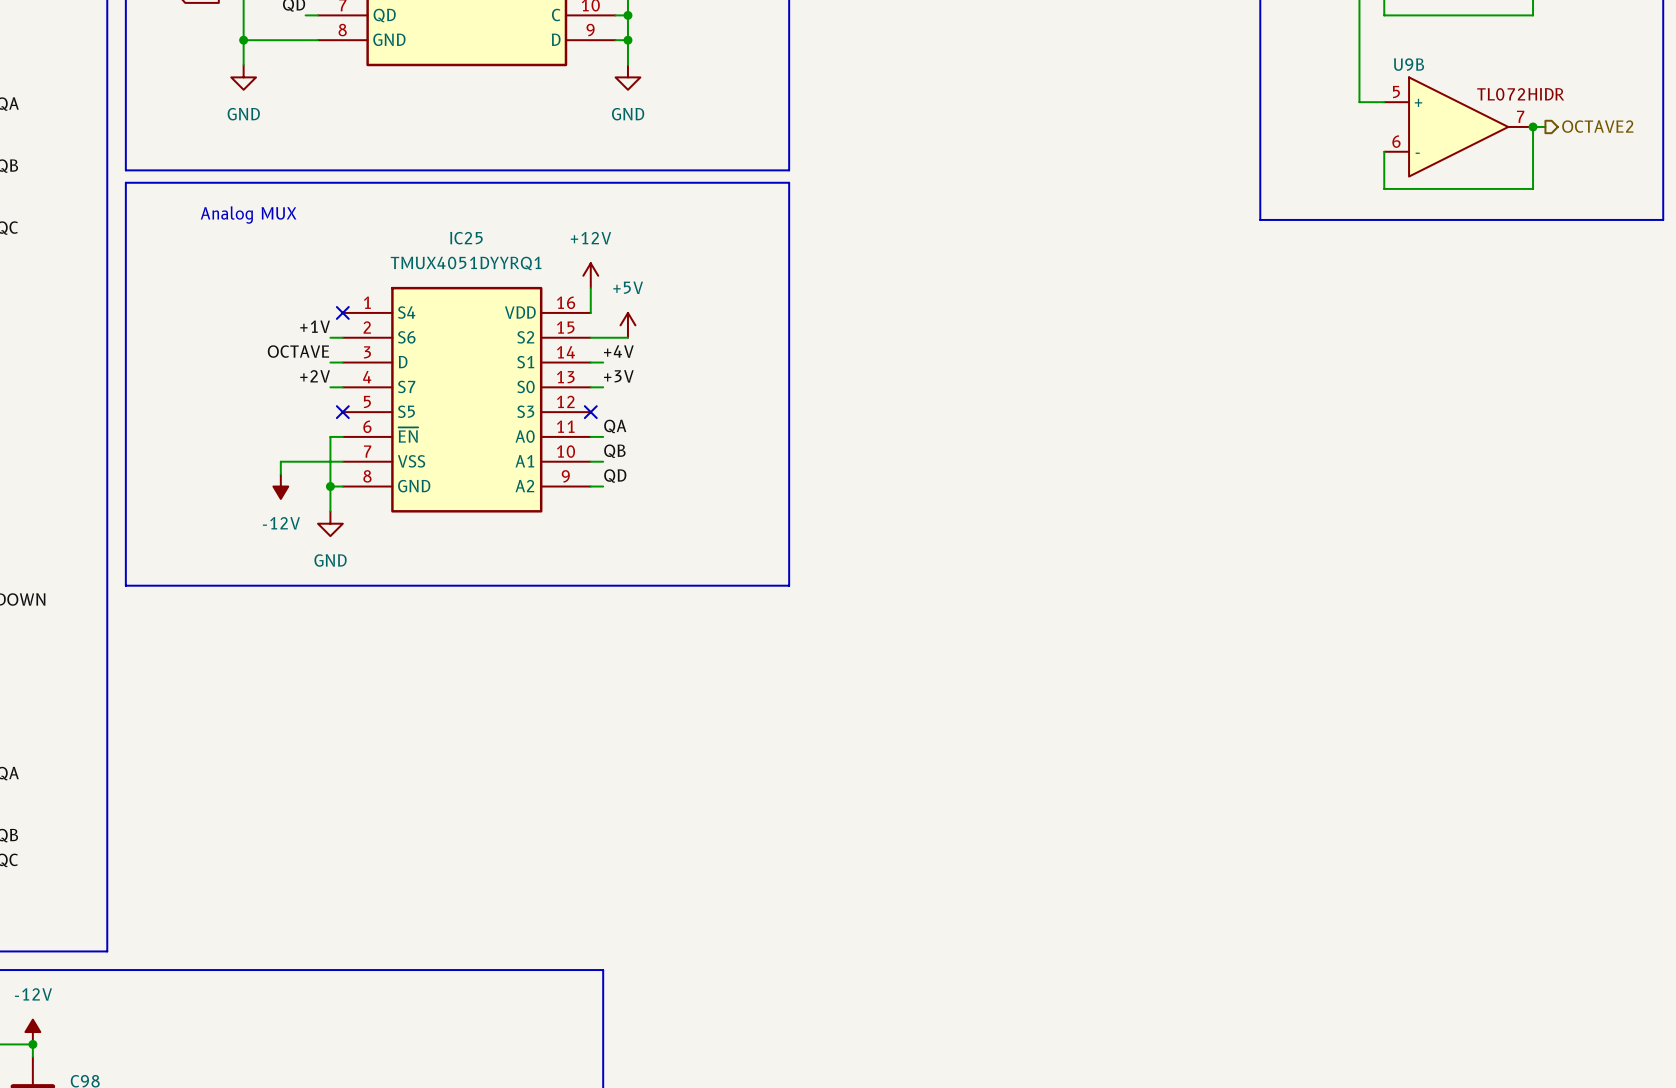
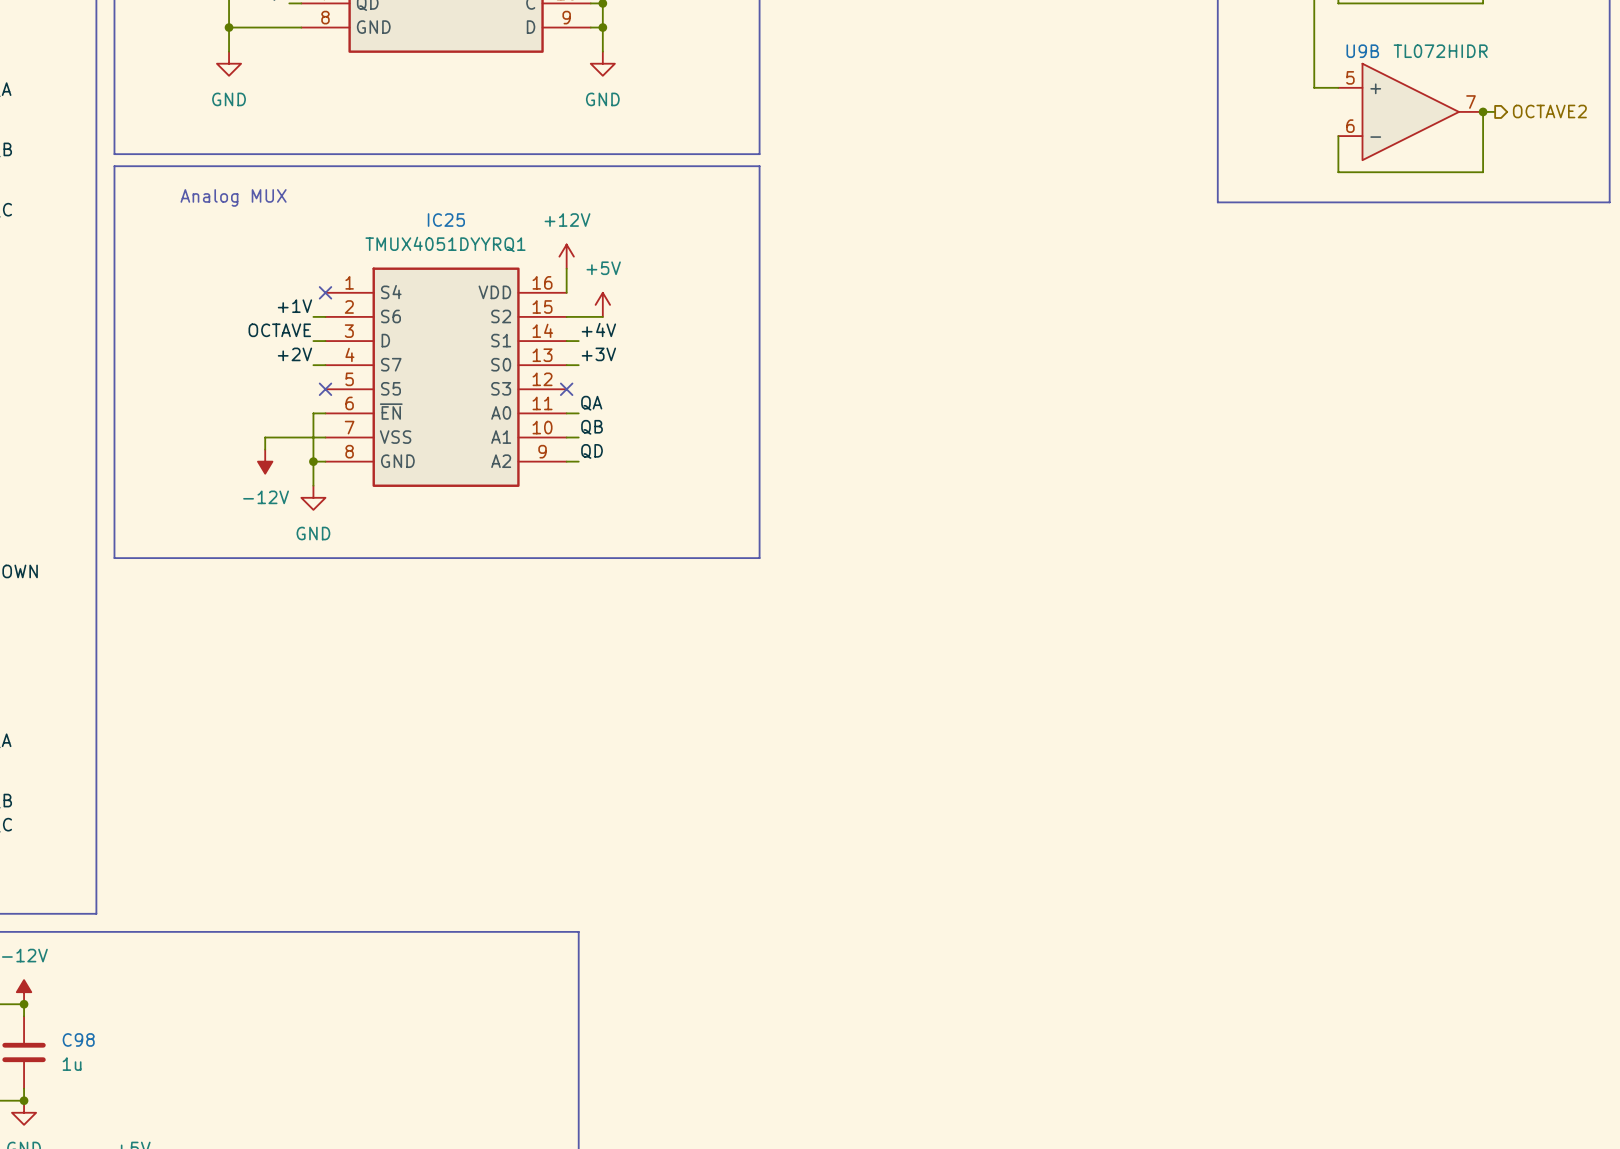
U9B value: none -> TL072HIDR (1440, 51)
U9B text: TL072HIDR (1520, 94) -> none

